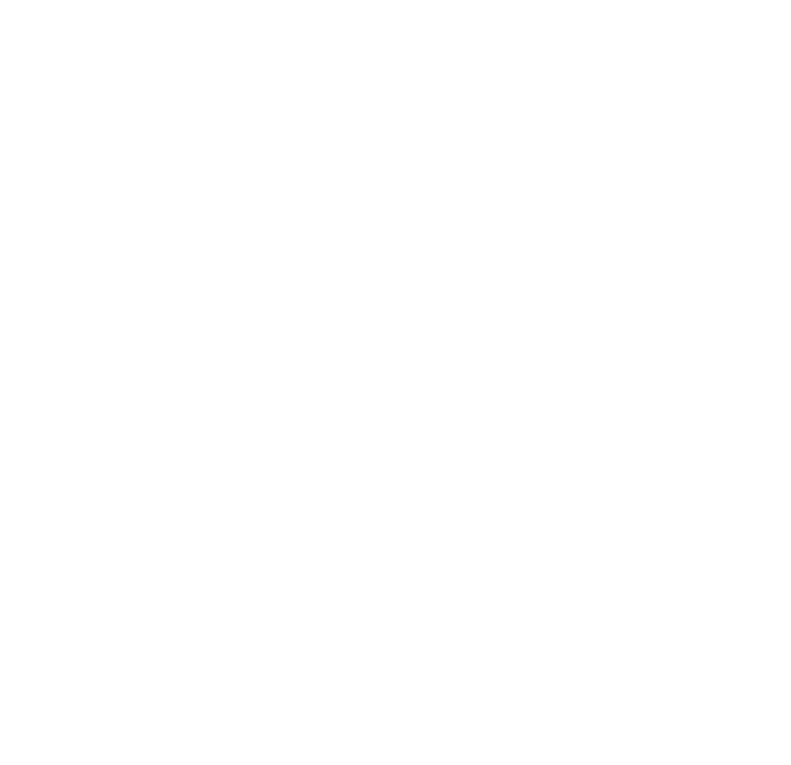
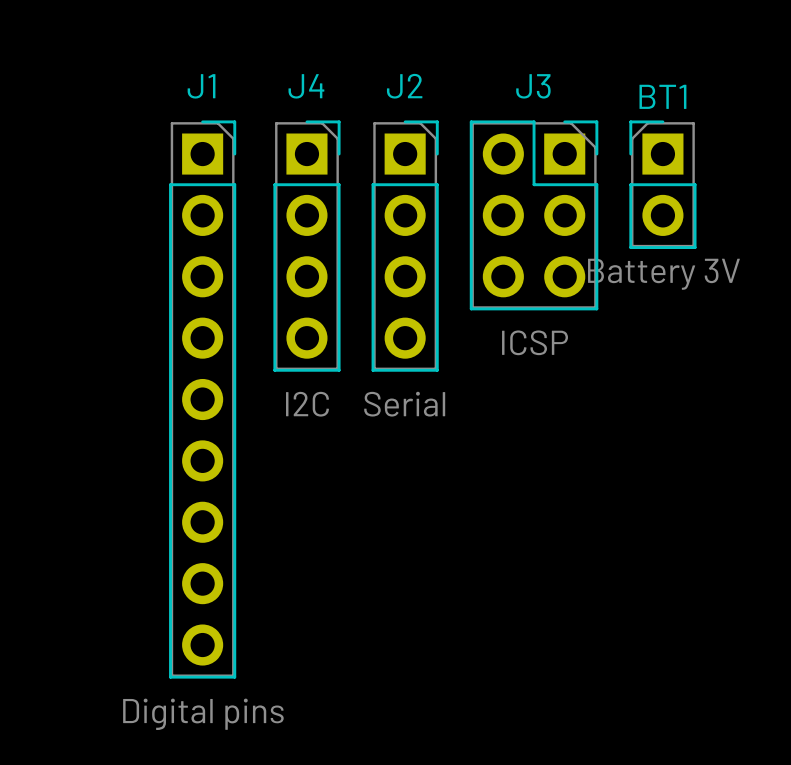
BT1: none -> Battery 3V (662, 184)
J3: none -> ICSP (534, 215)
J4: none -> I2C (306, 246)
J2: none -> Serial (405, 246)
J1: none -> Digital pins (202, 399)

